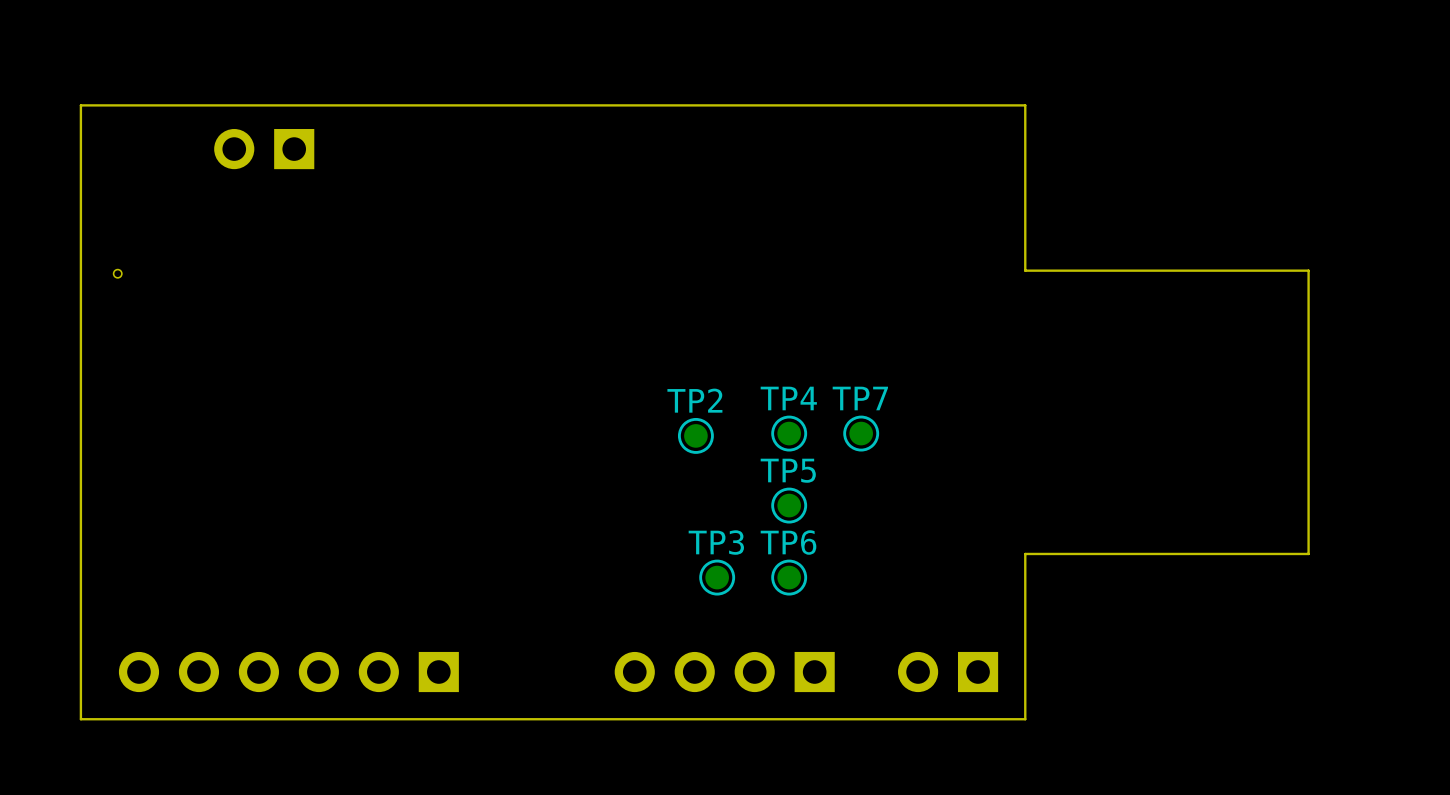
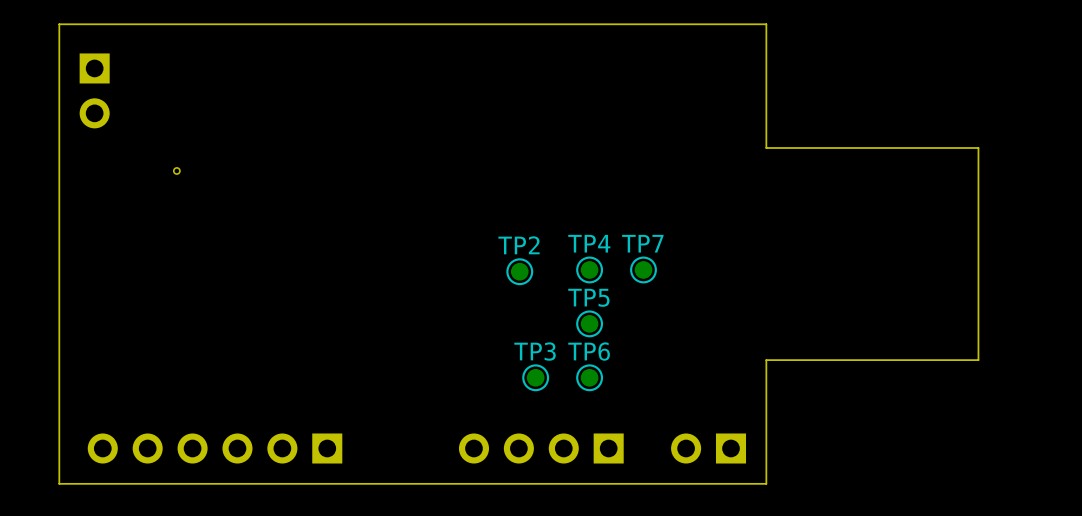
part rotation: 0° (264, 149) -> 90° counterclockwise (94, 90)
part position: (264, 149) -> (94, 90)
part position: (117, 273) -> (176, 170)

